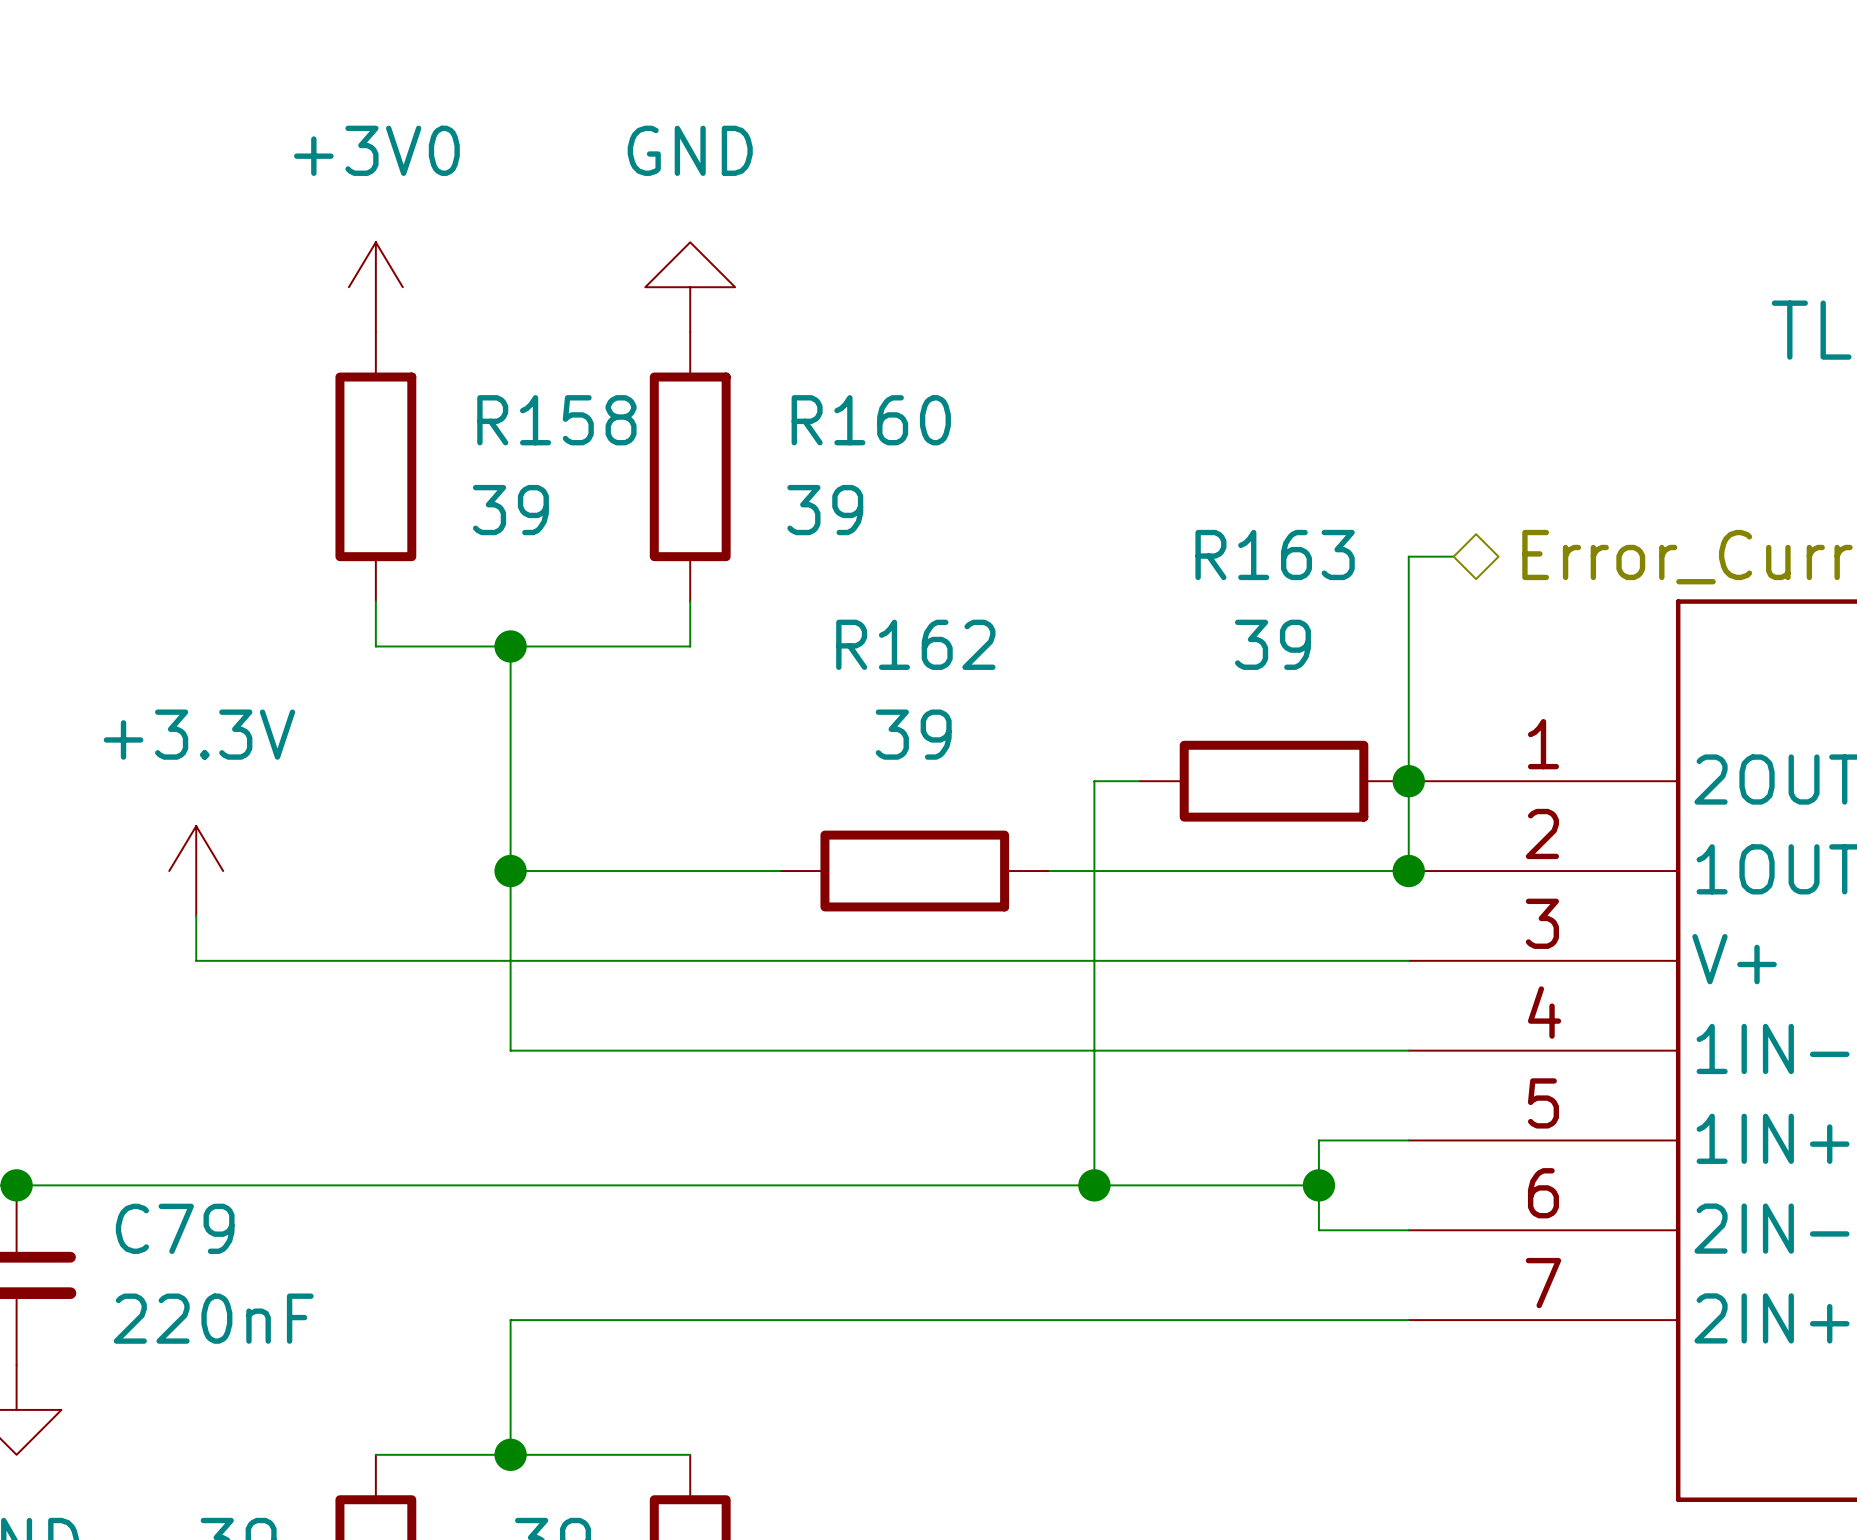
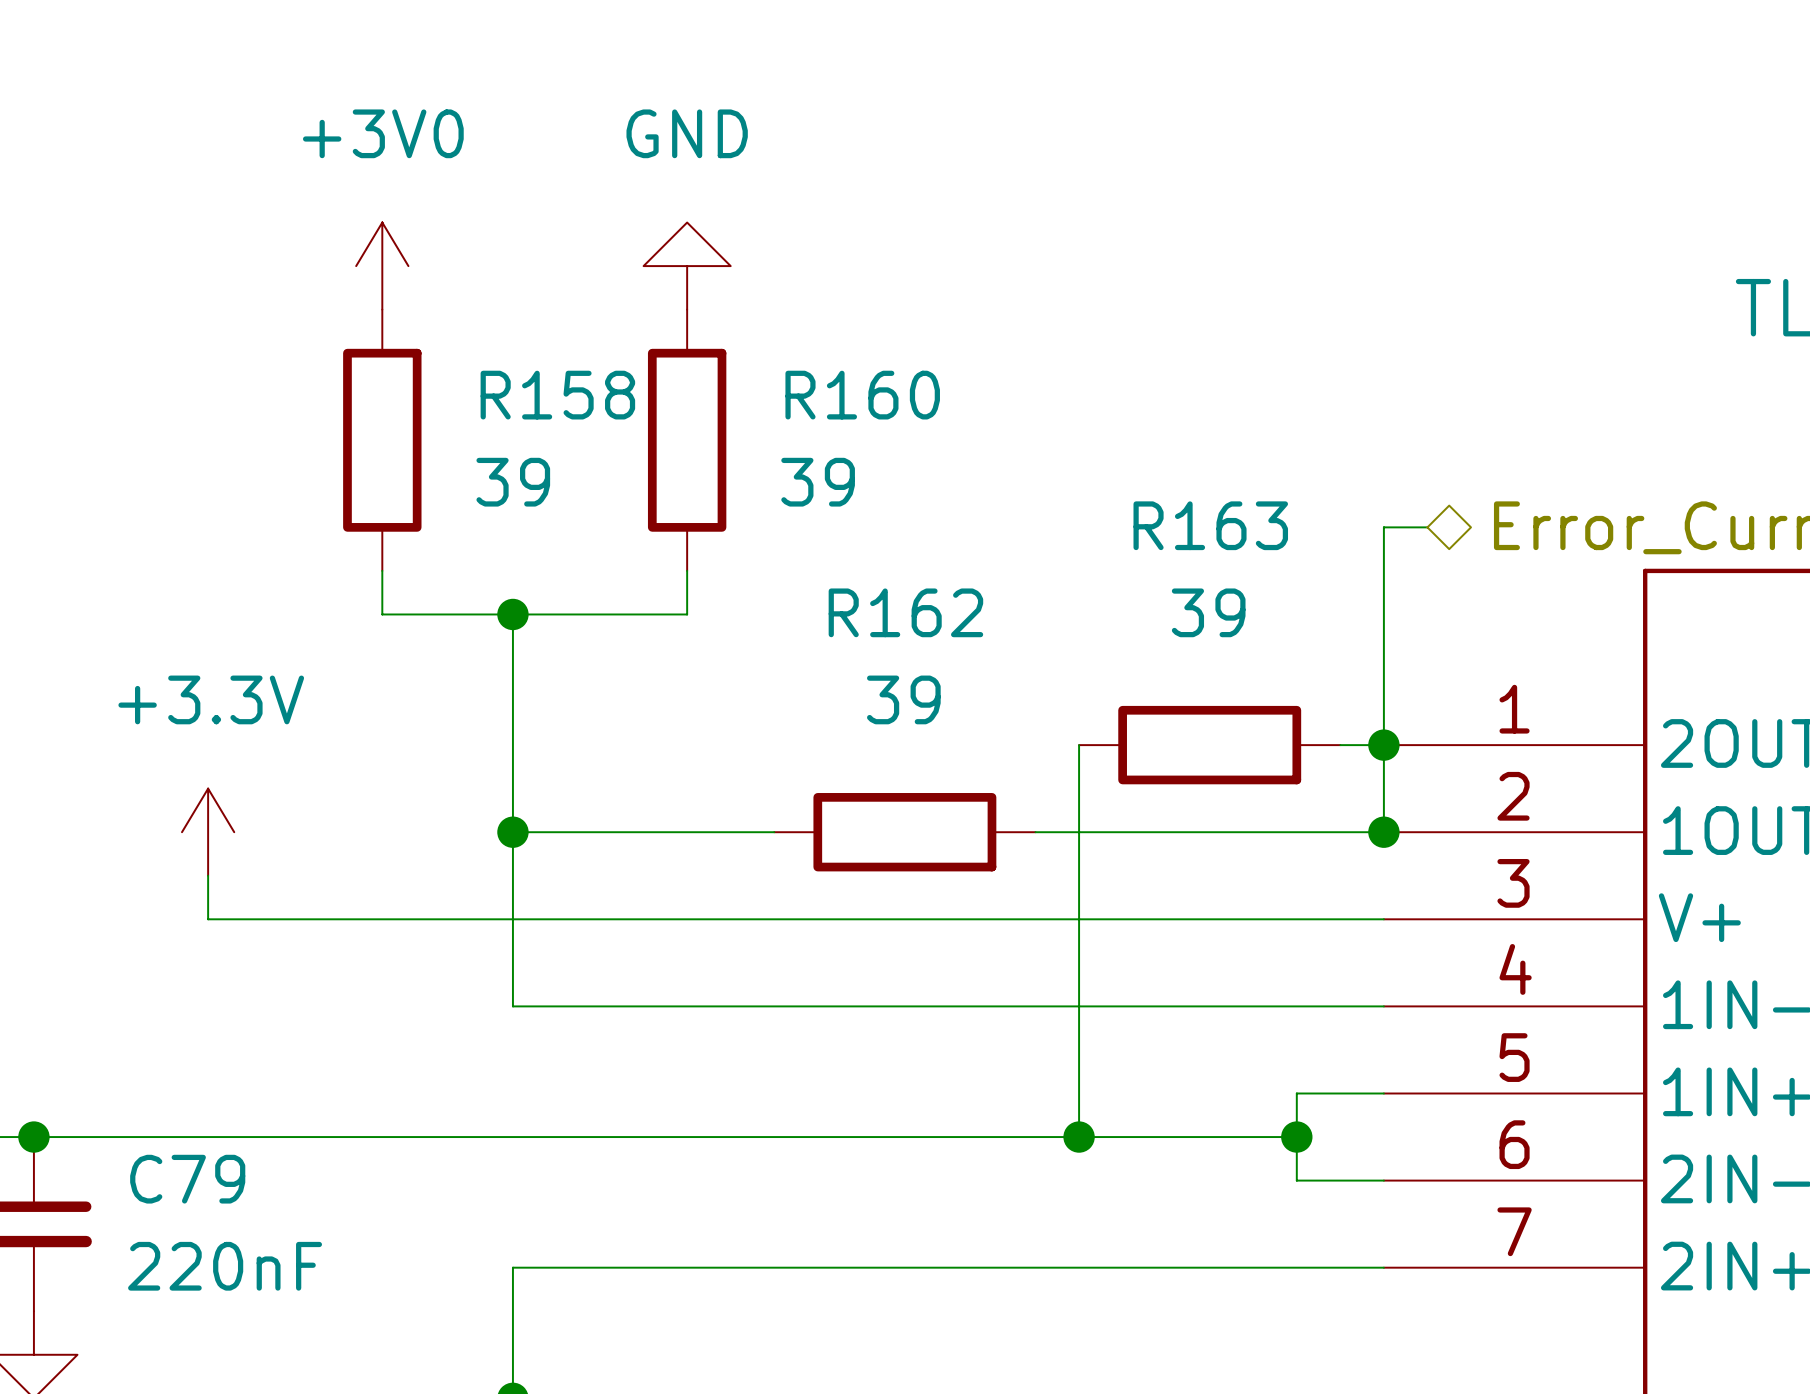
R163 position: (1274, 781) -> (1209, 745)

